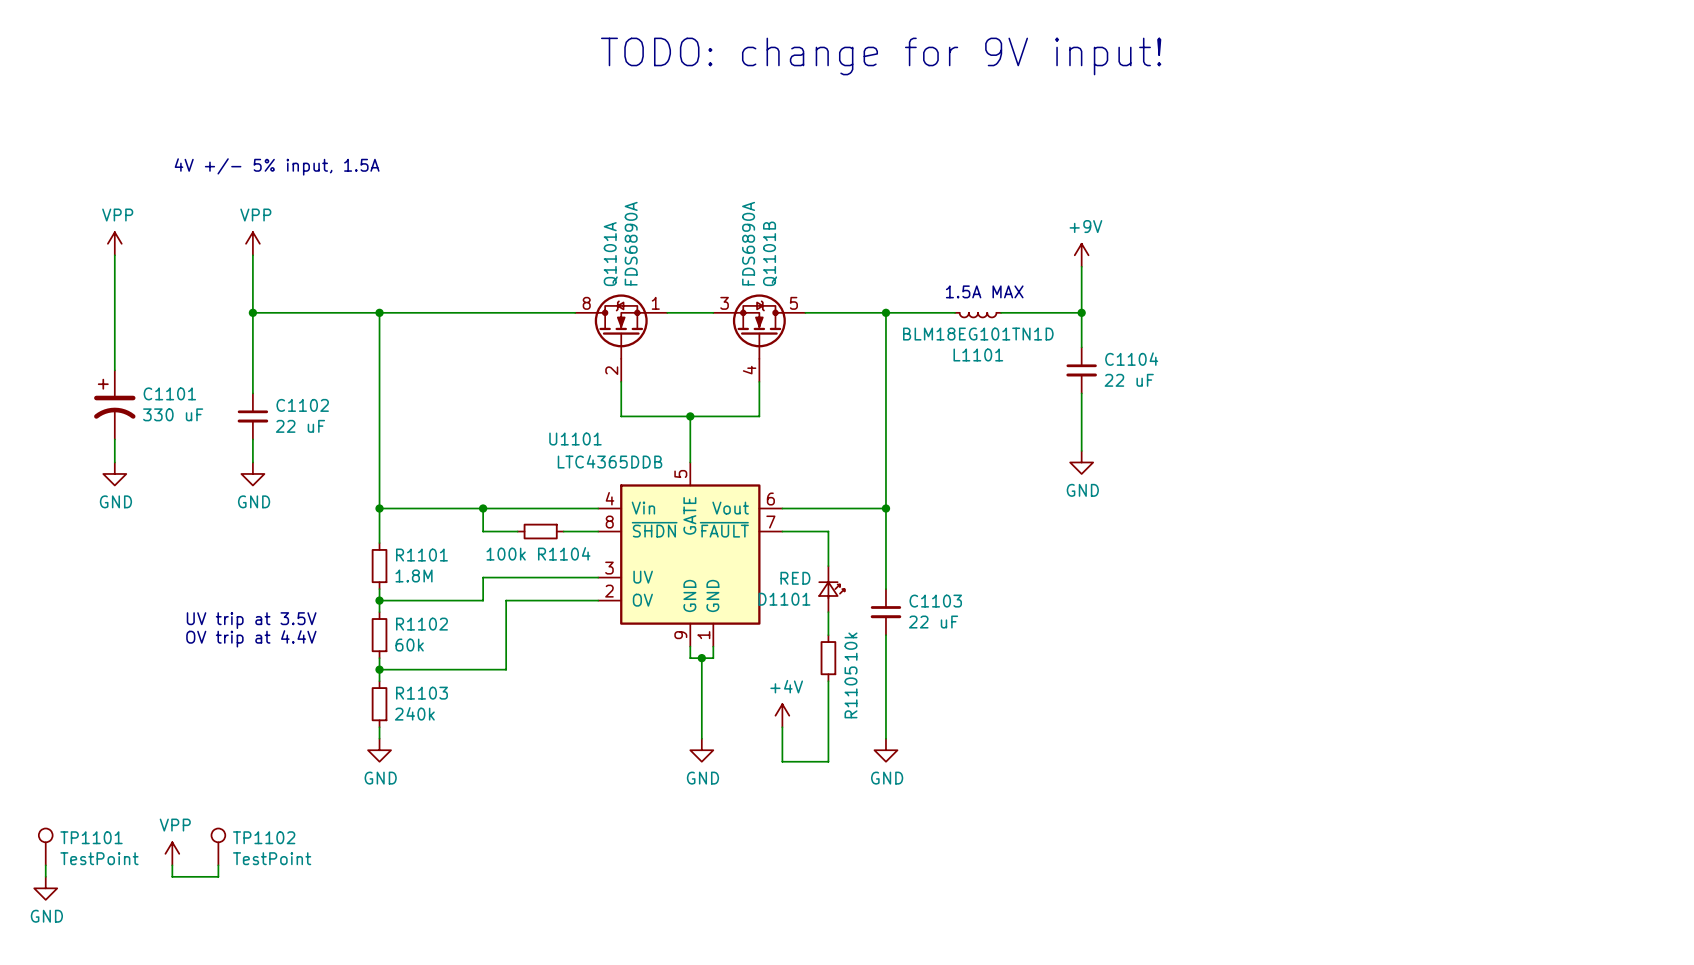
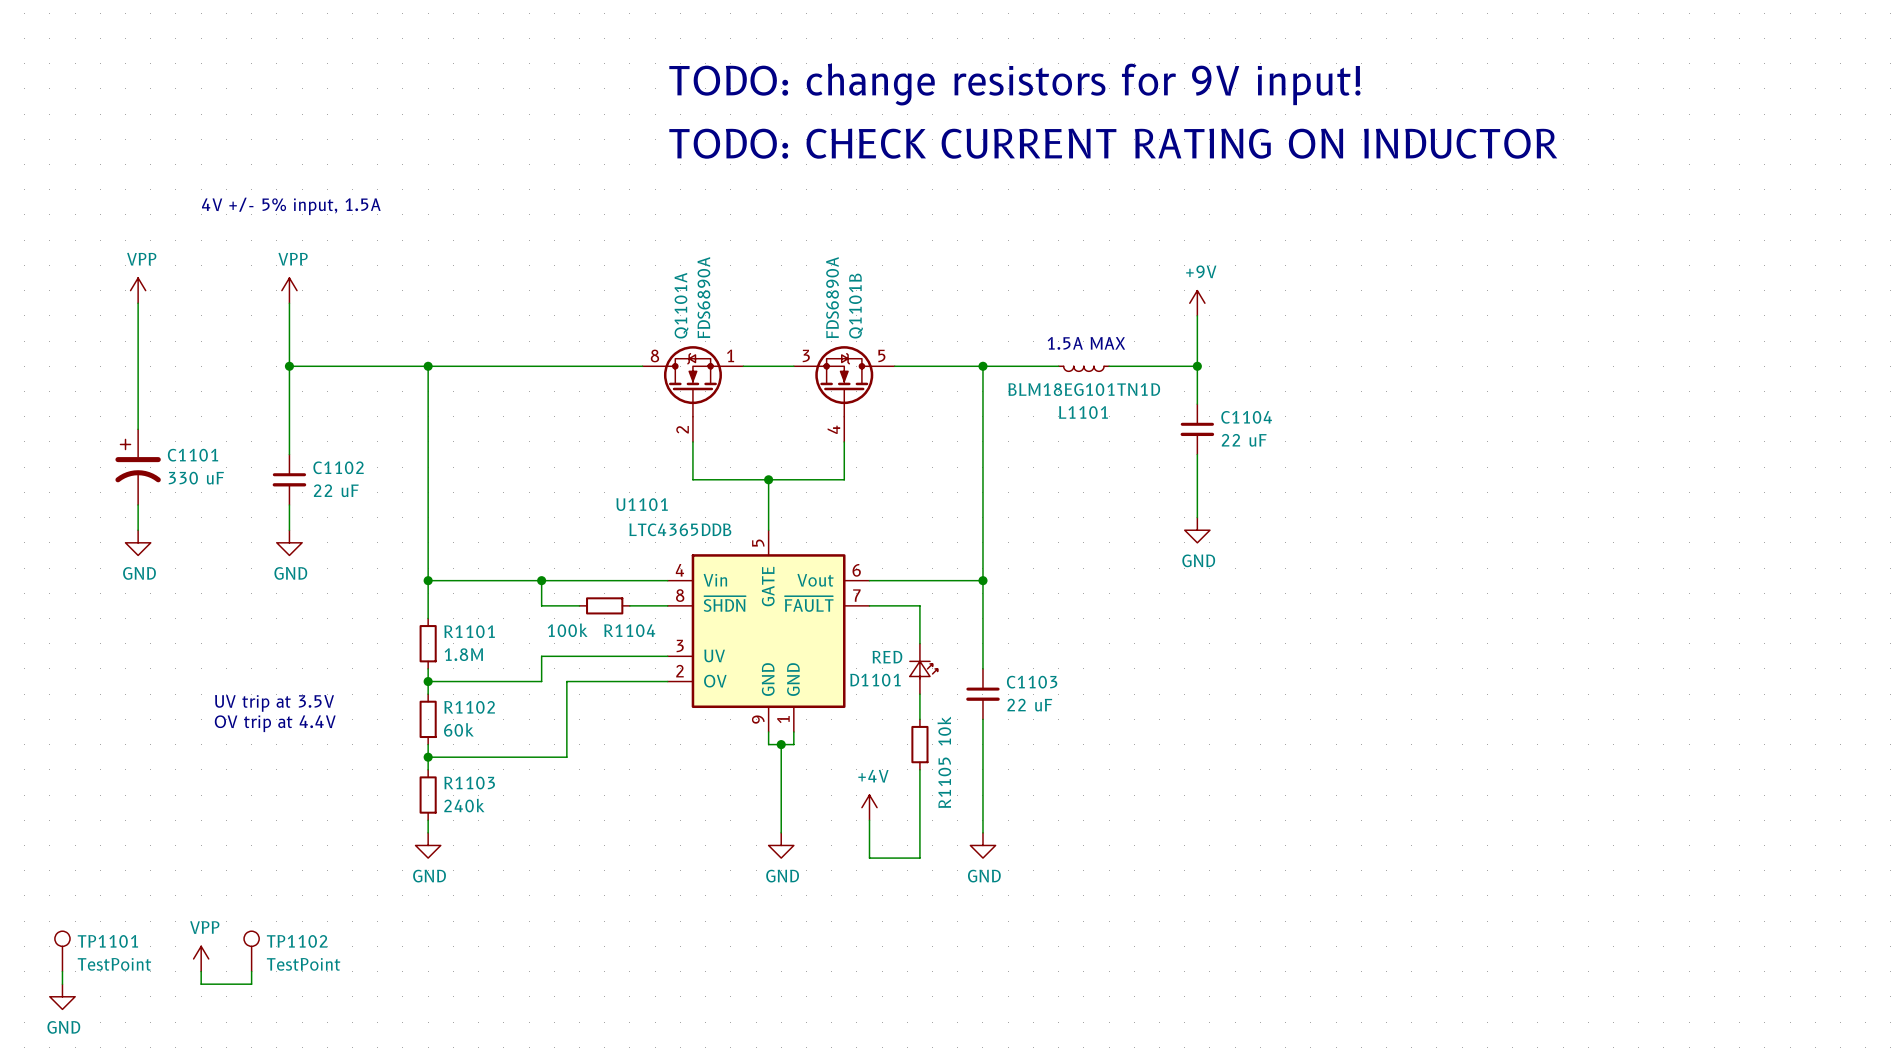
text: TODO: change for 9V input! (881, 56) -> TODO: change resistors for 9V input! (1014, 84)
text: none -> TODO: CHECK CURRENT RATING ON INDUCTOR (1113, 143)

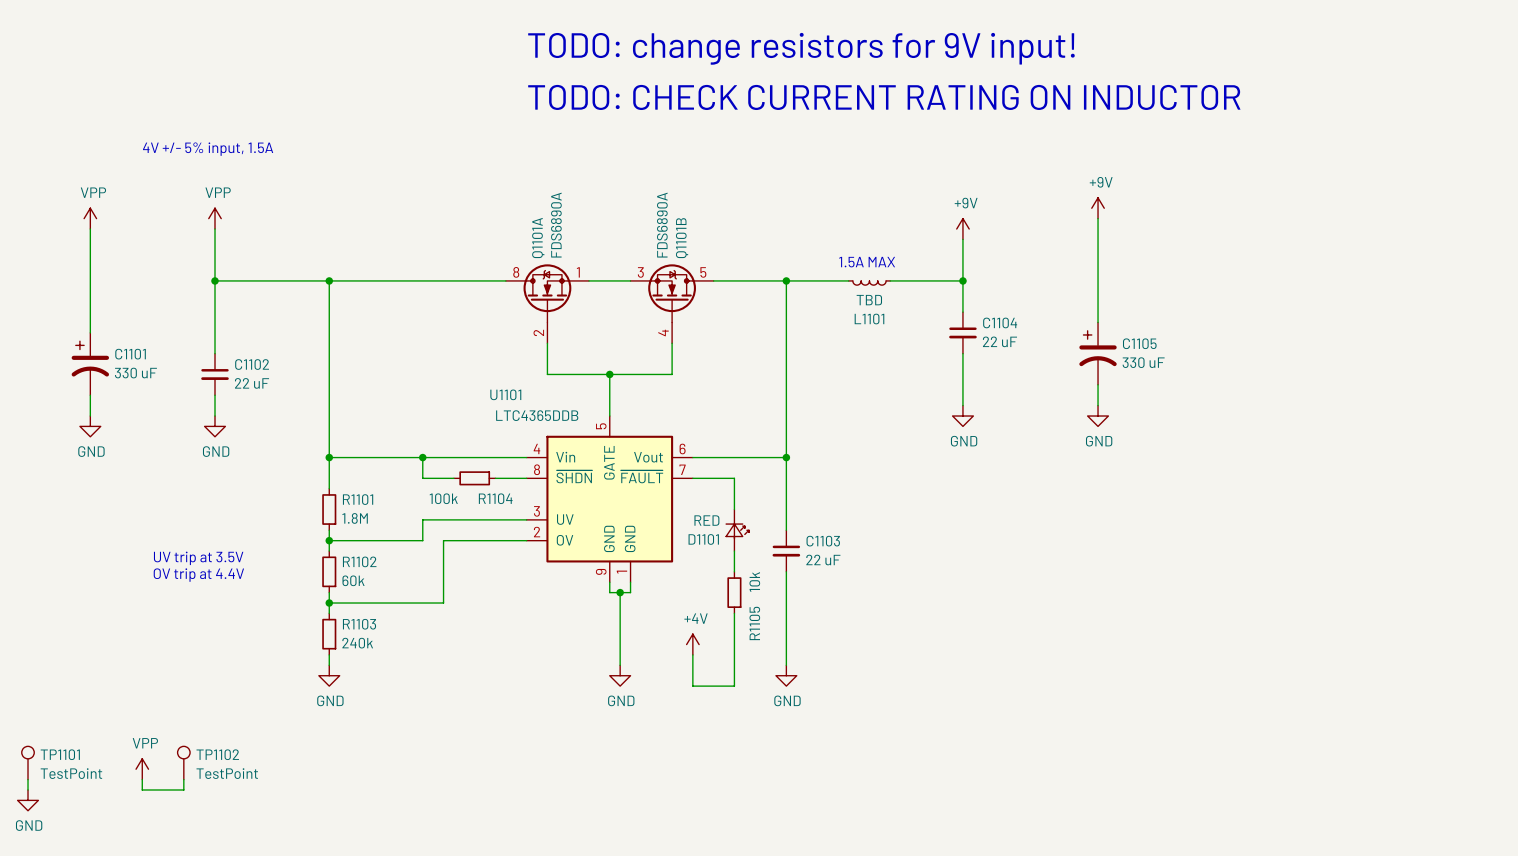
power symbol: none -> +9V (1098, 208)
wire: none -> (1098, 218) (1098, 322)
L1101 value: BLM18EG101TN1D (1084, 389) -> TBD (869, 300)
C1105: none -> 330 uF (1098, 353)
wire: none -> (1098, 384) (1098, 405)
power symbol: none -> GND (1098, 416)

